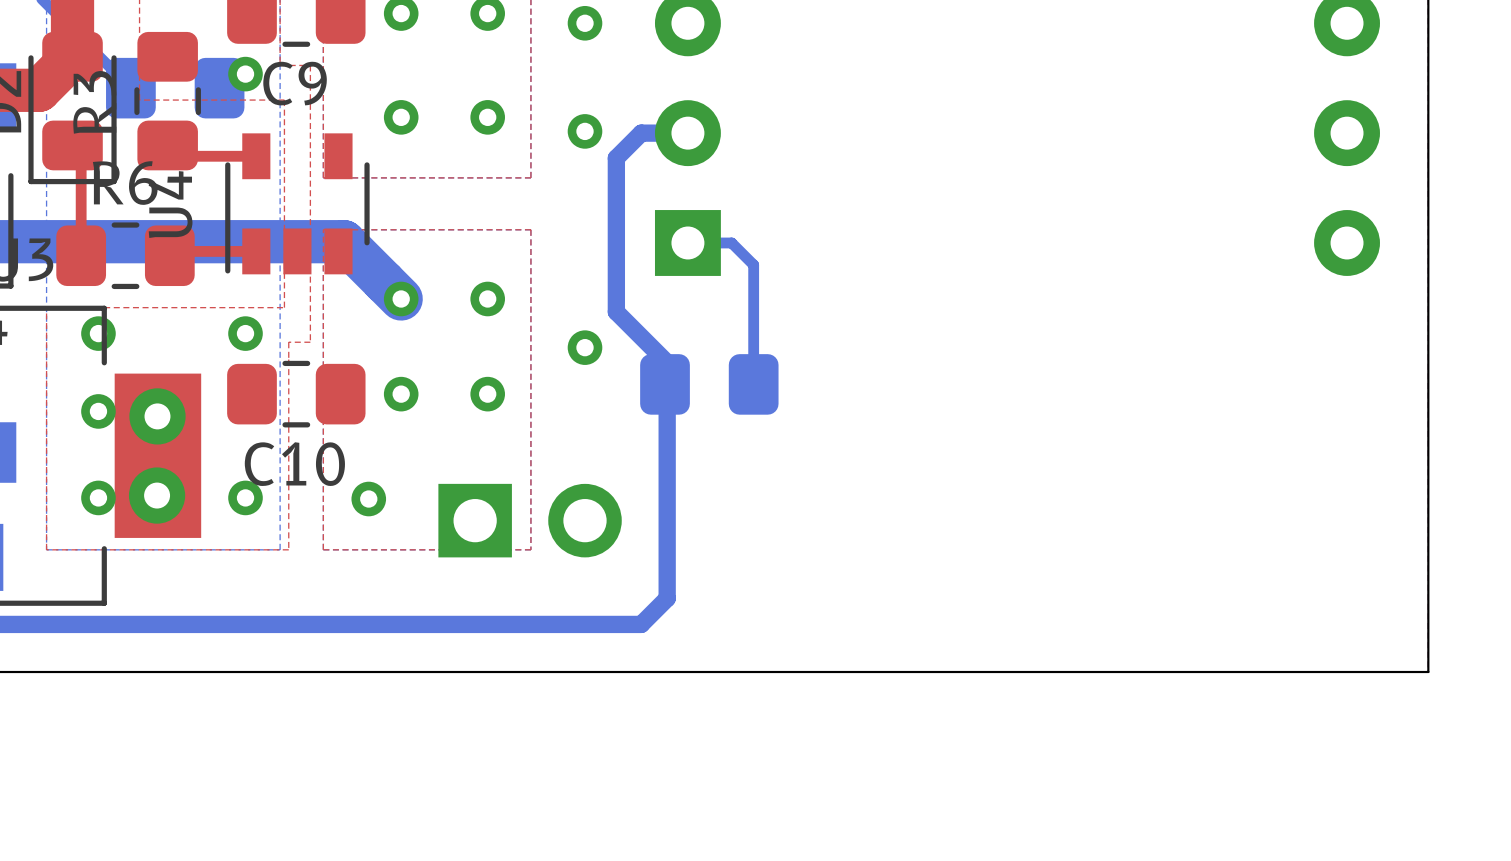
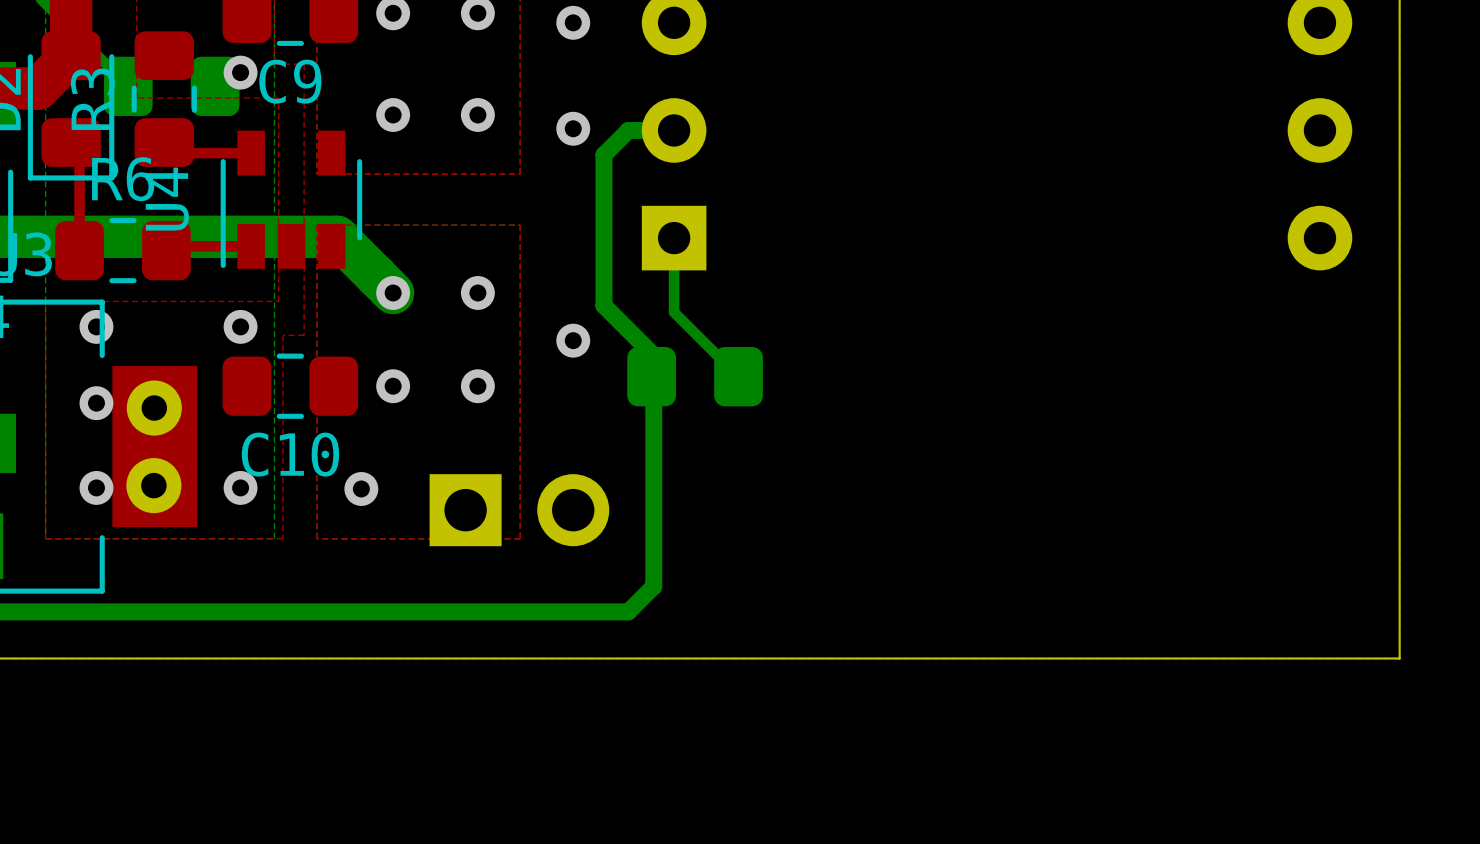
bottom track: (687, 242) (731, 242) (753, 264) (753, 384) -> (674, 238) (674, 312) (738, 376)

